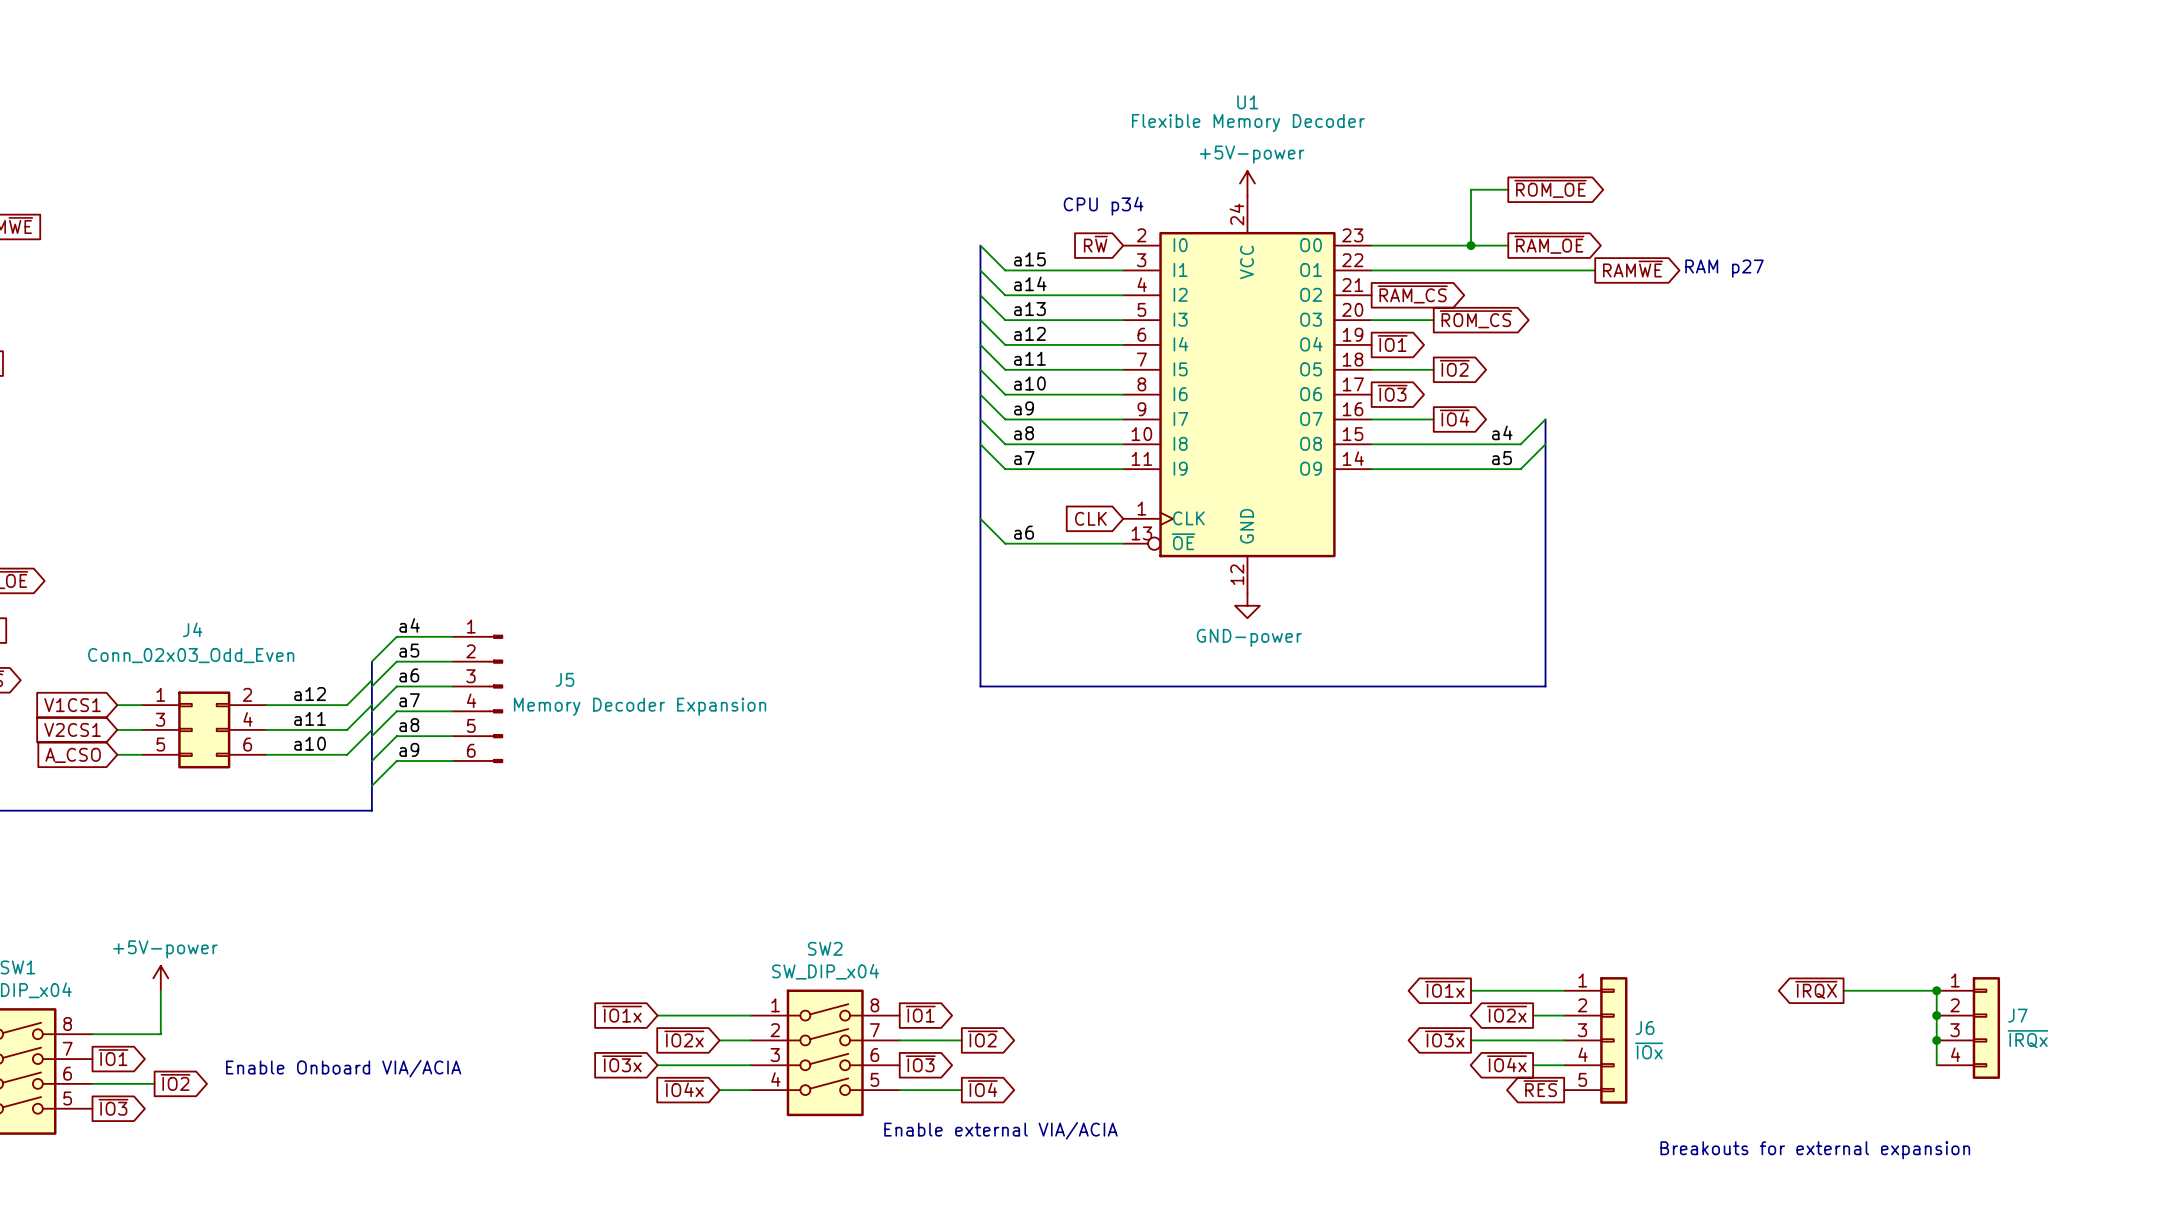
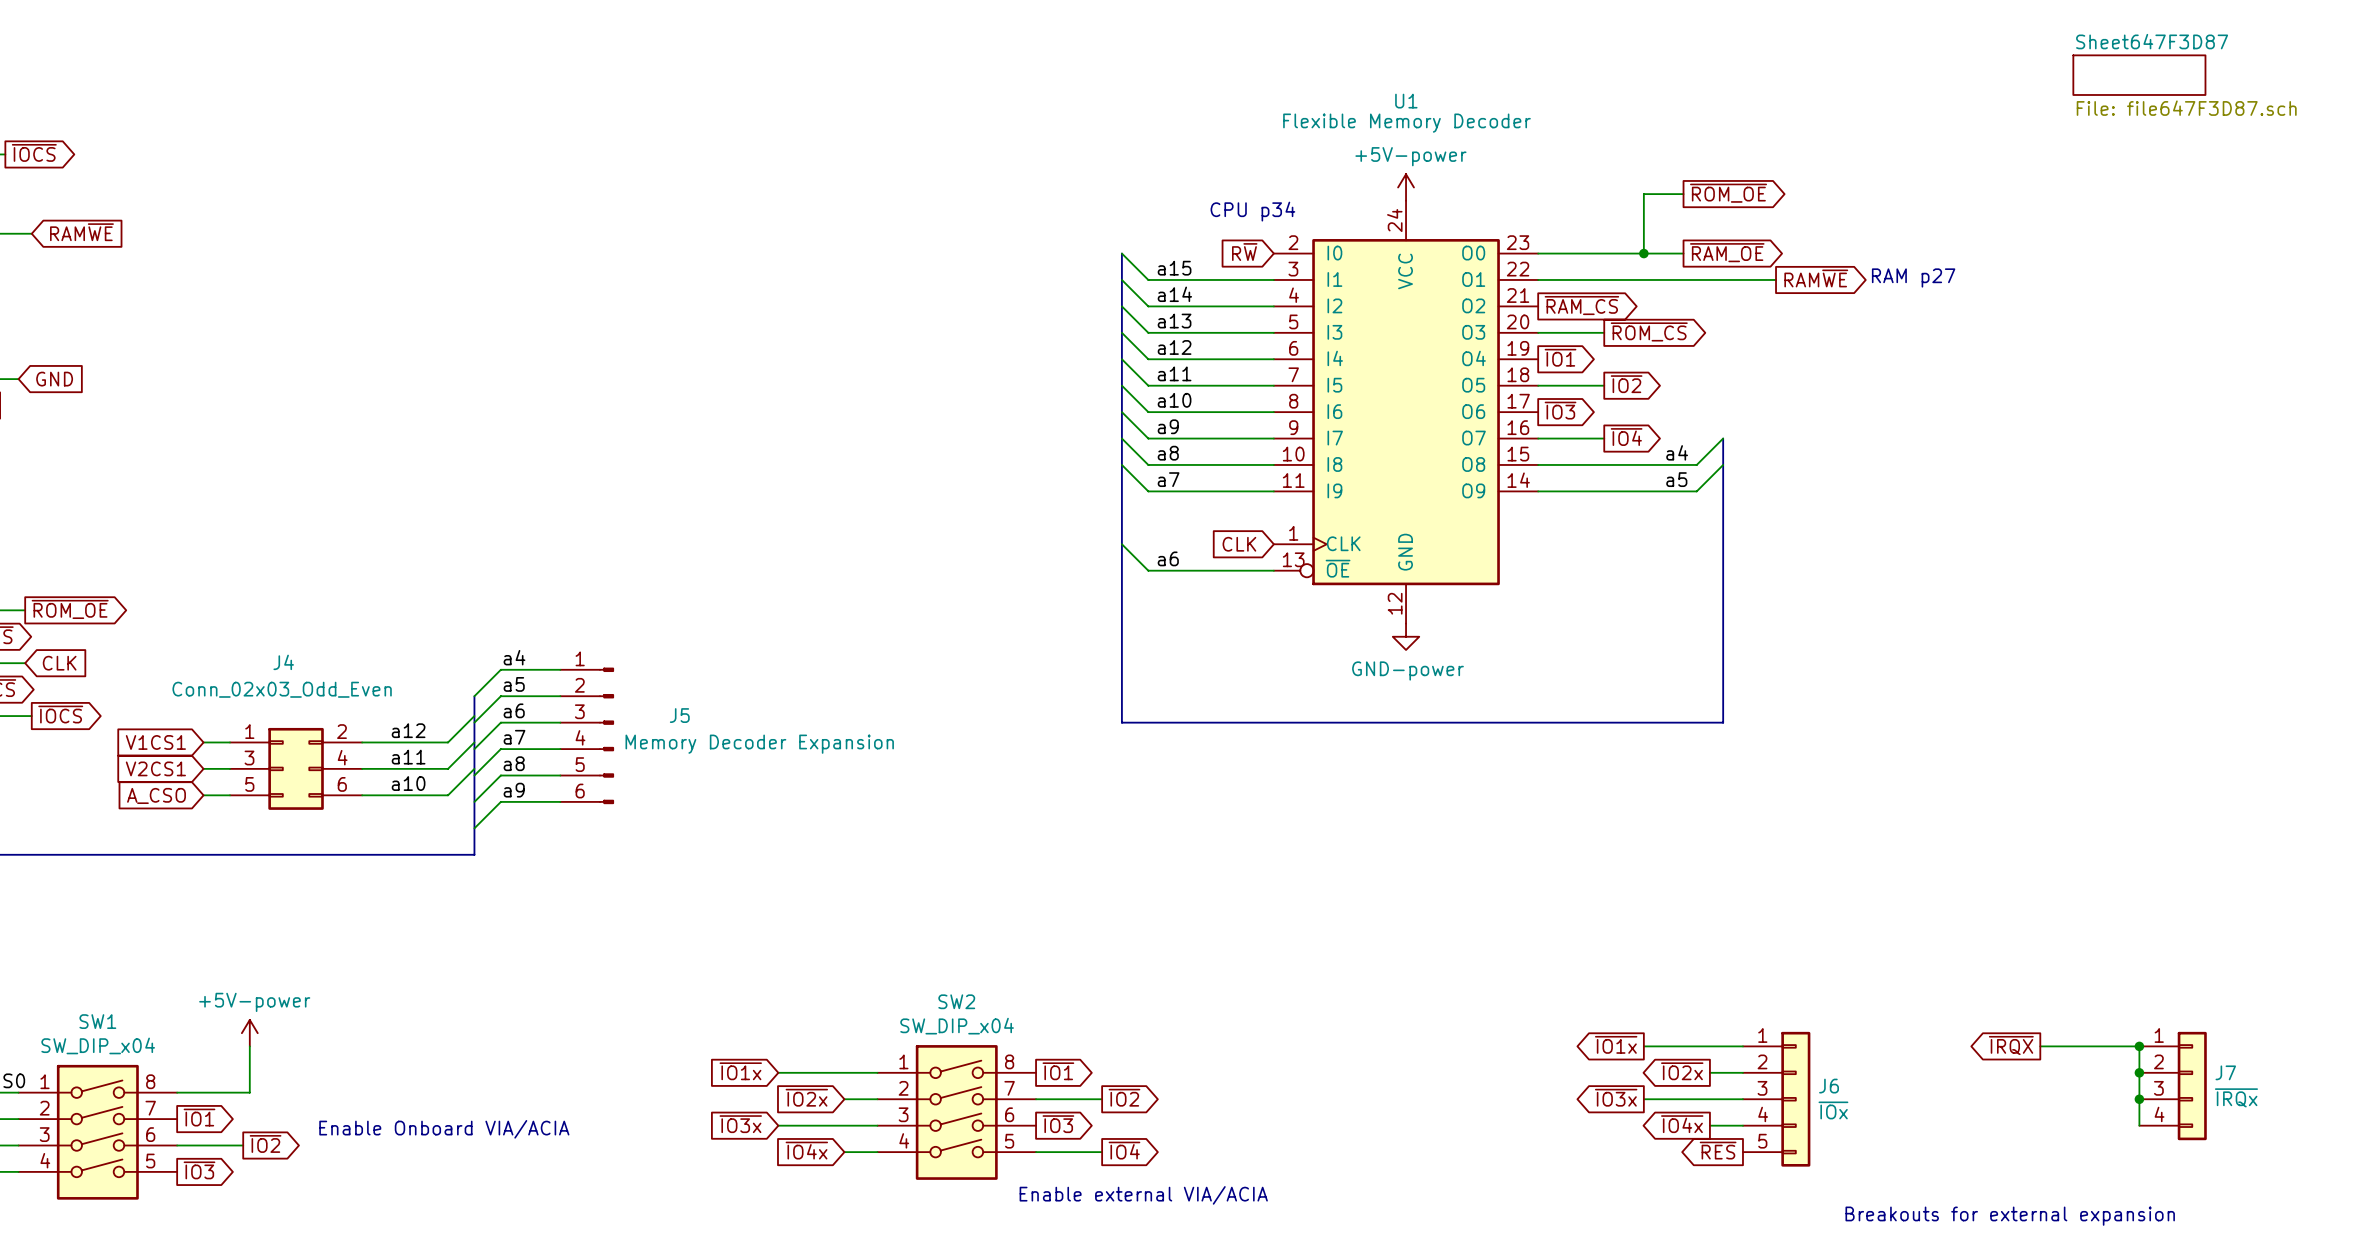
sheet Sheet647F3D87: none -> File: file647F3D87.sch (2139, 75)

